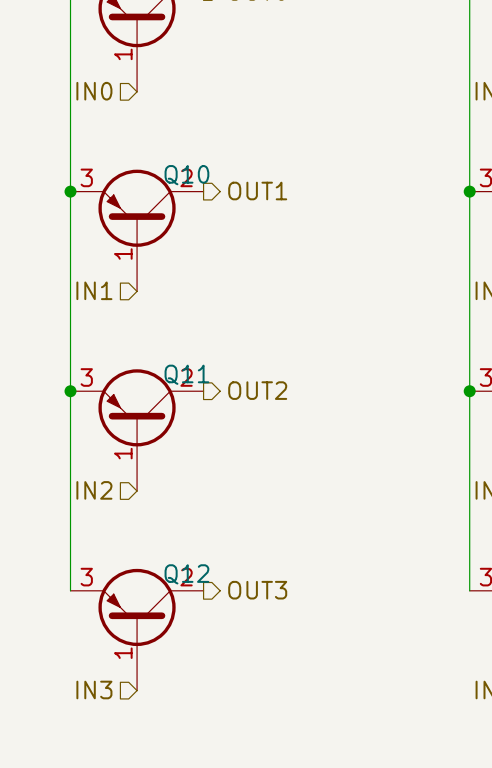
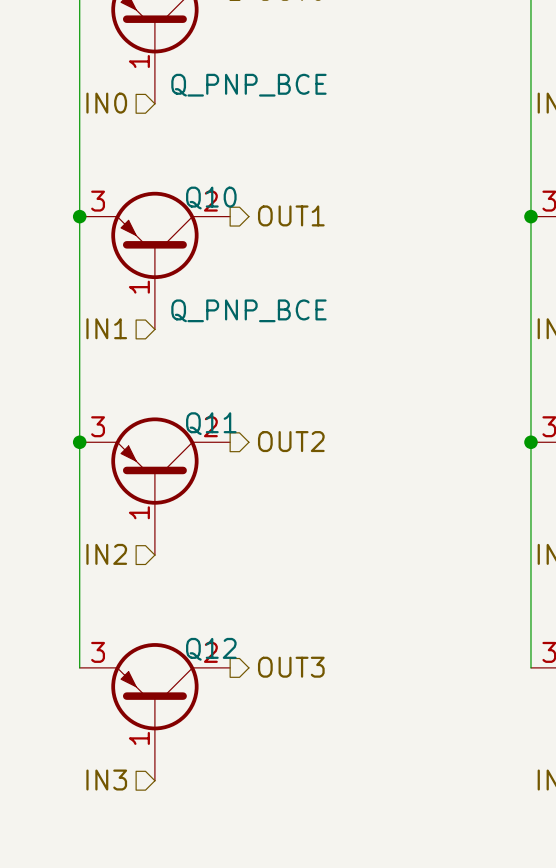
part value: none -> Q_PNP_BCE (248, 85)
Q10 value: none -> Q_PNP_BCE (248, 310)

